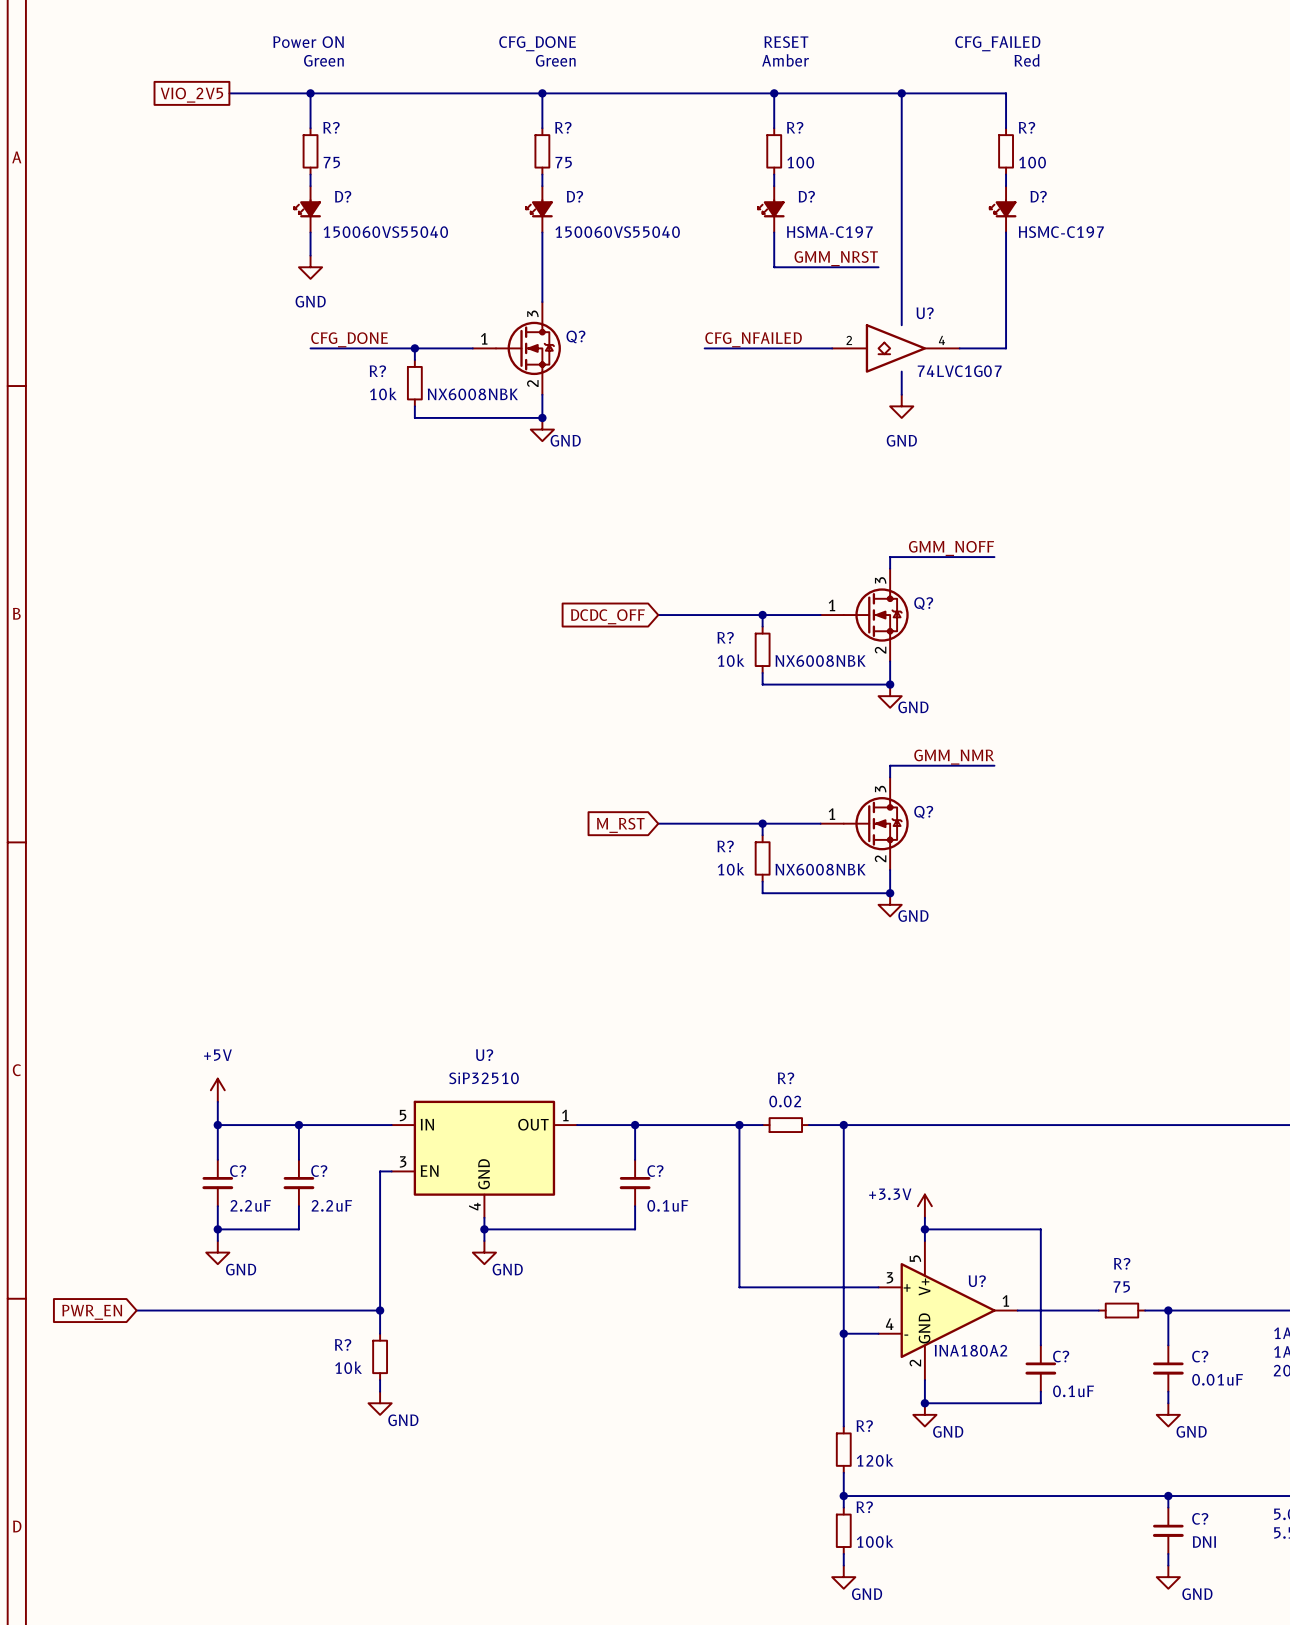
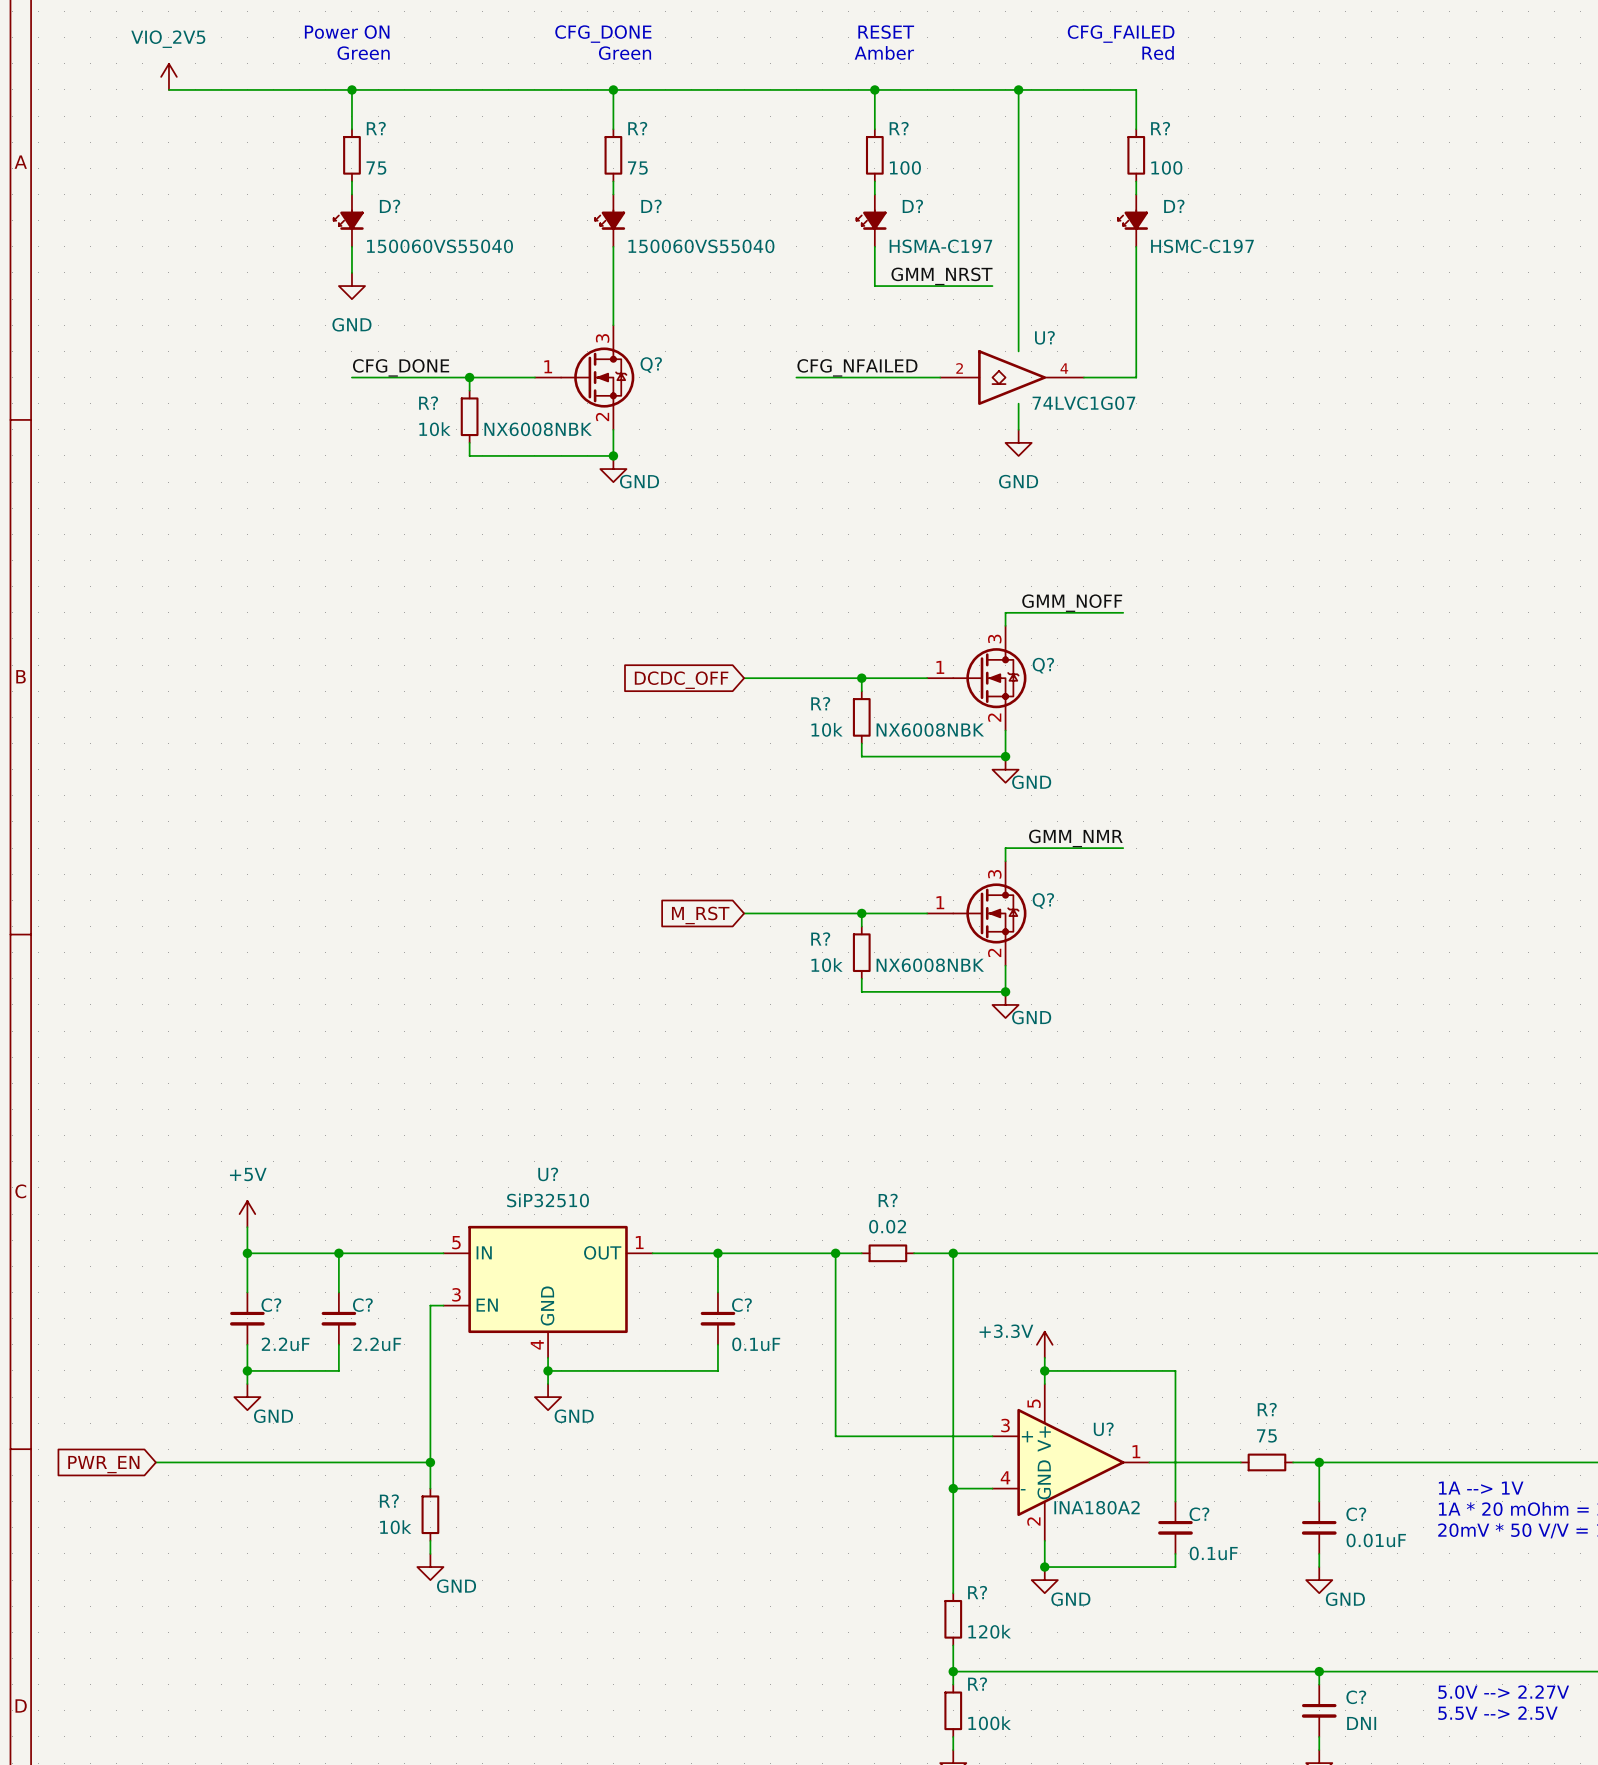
power symbol: none -> VIO_2V5 (168, 76)
wire: none -> (168, 89) (260, 89)
global label: VIO_2V5 (191, 95) -> none

